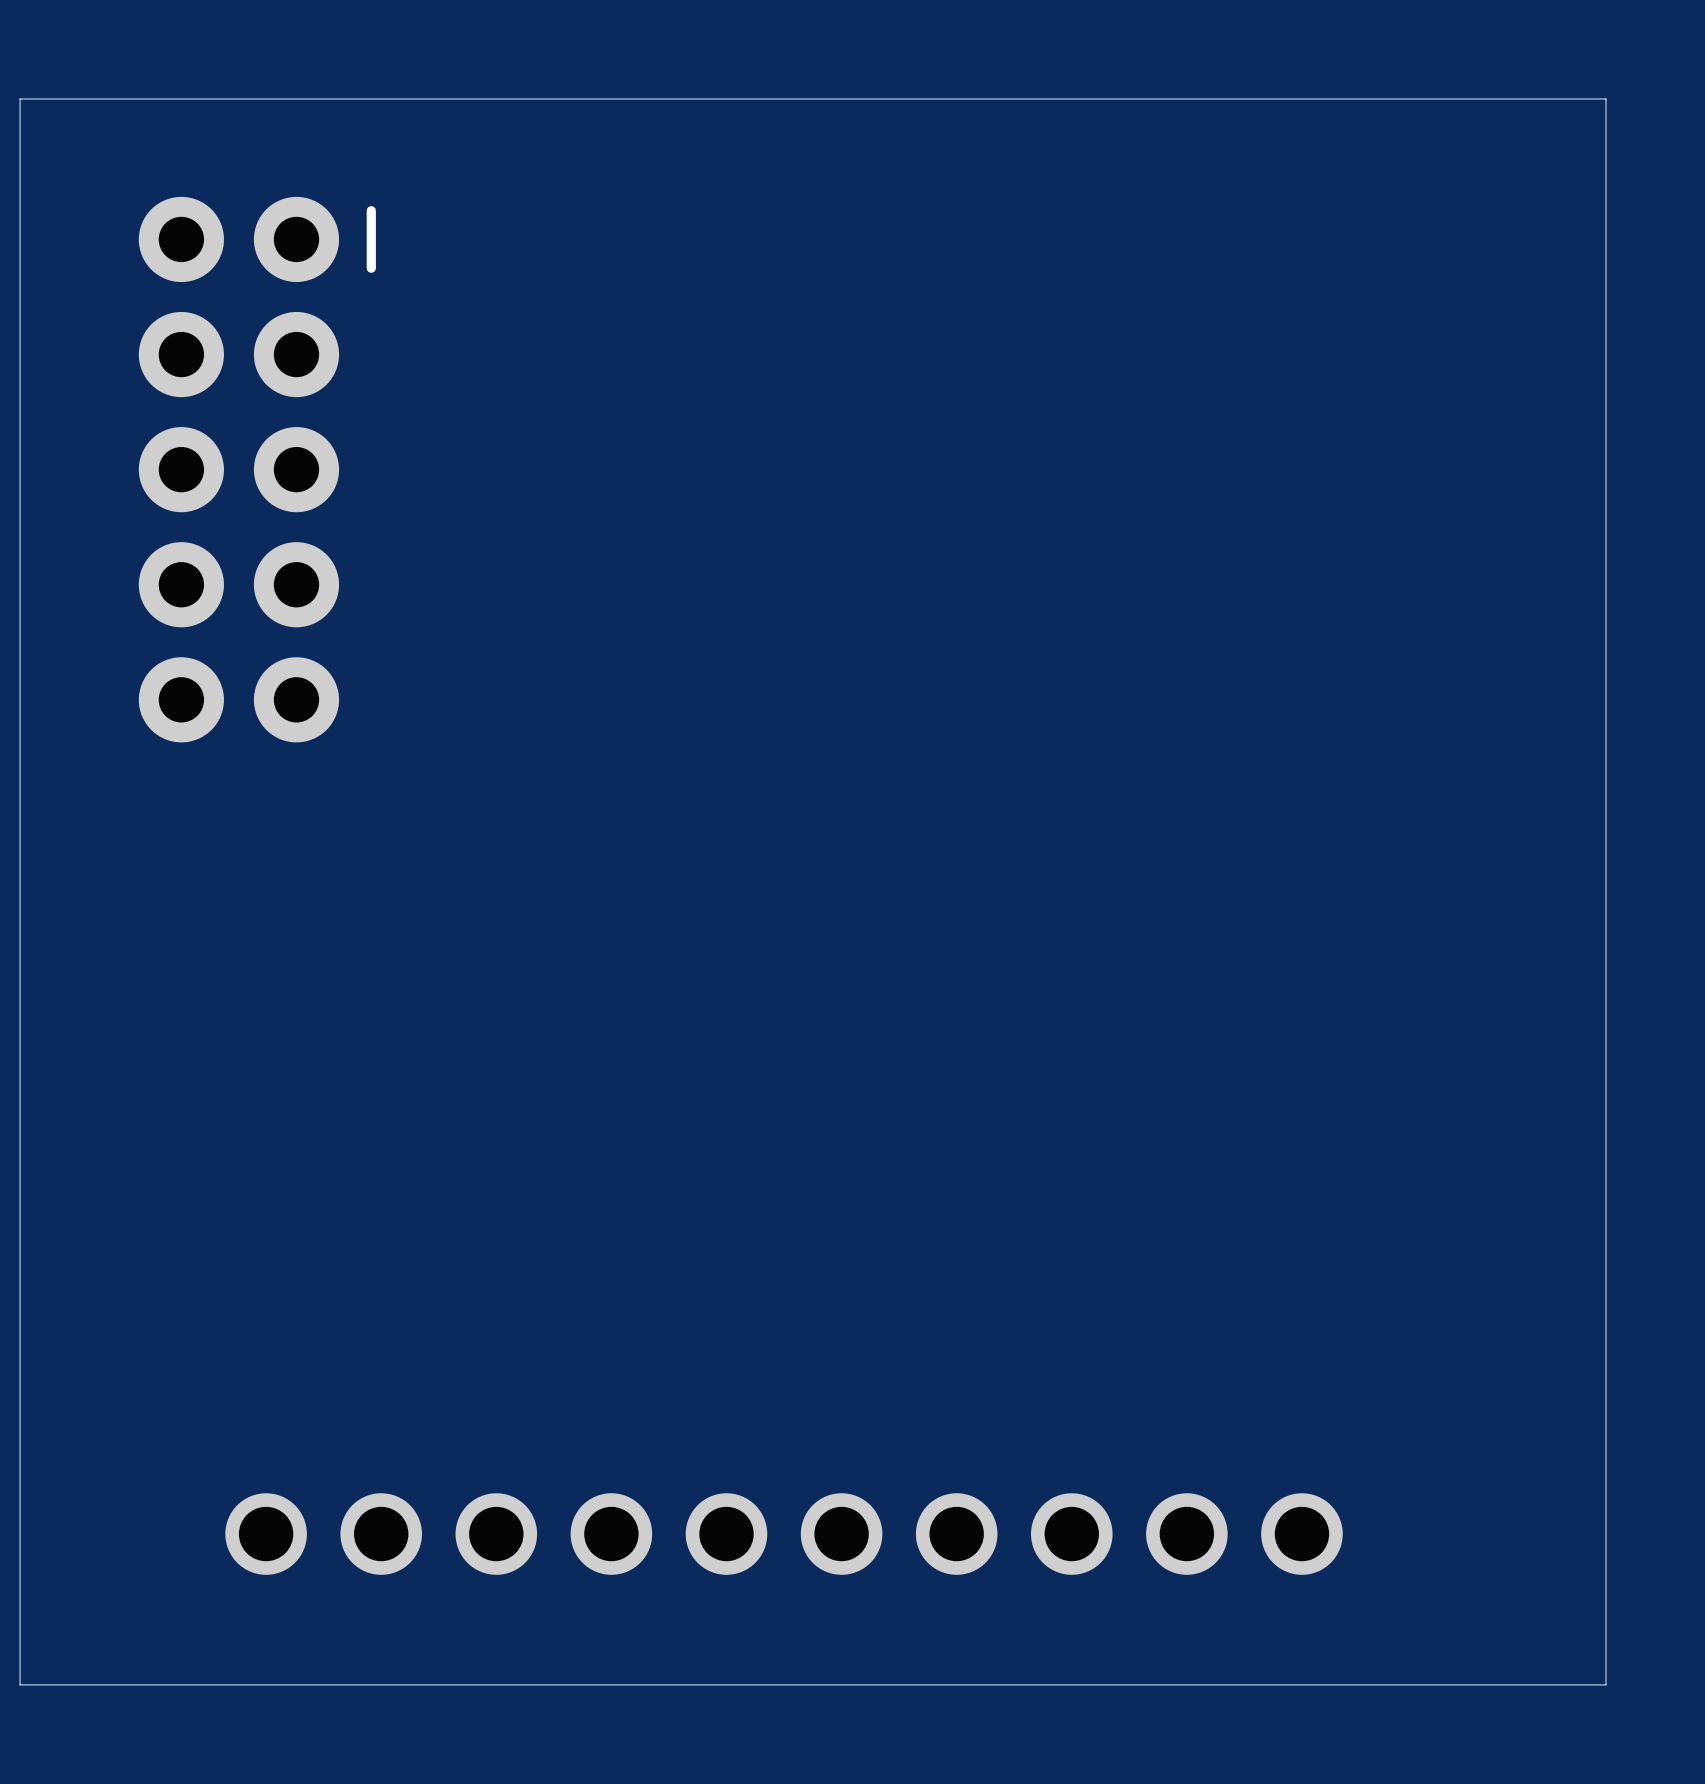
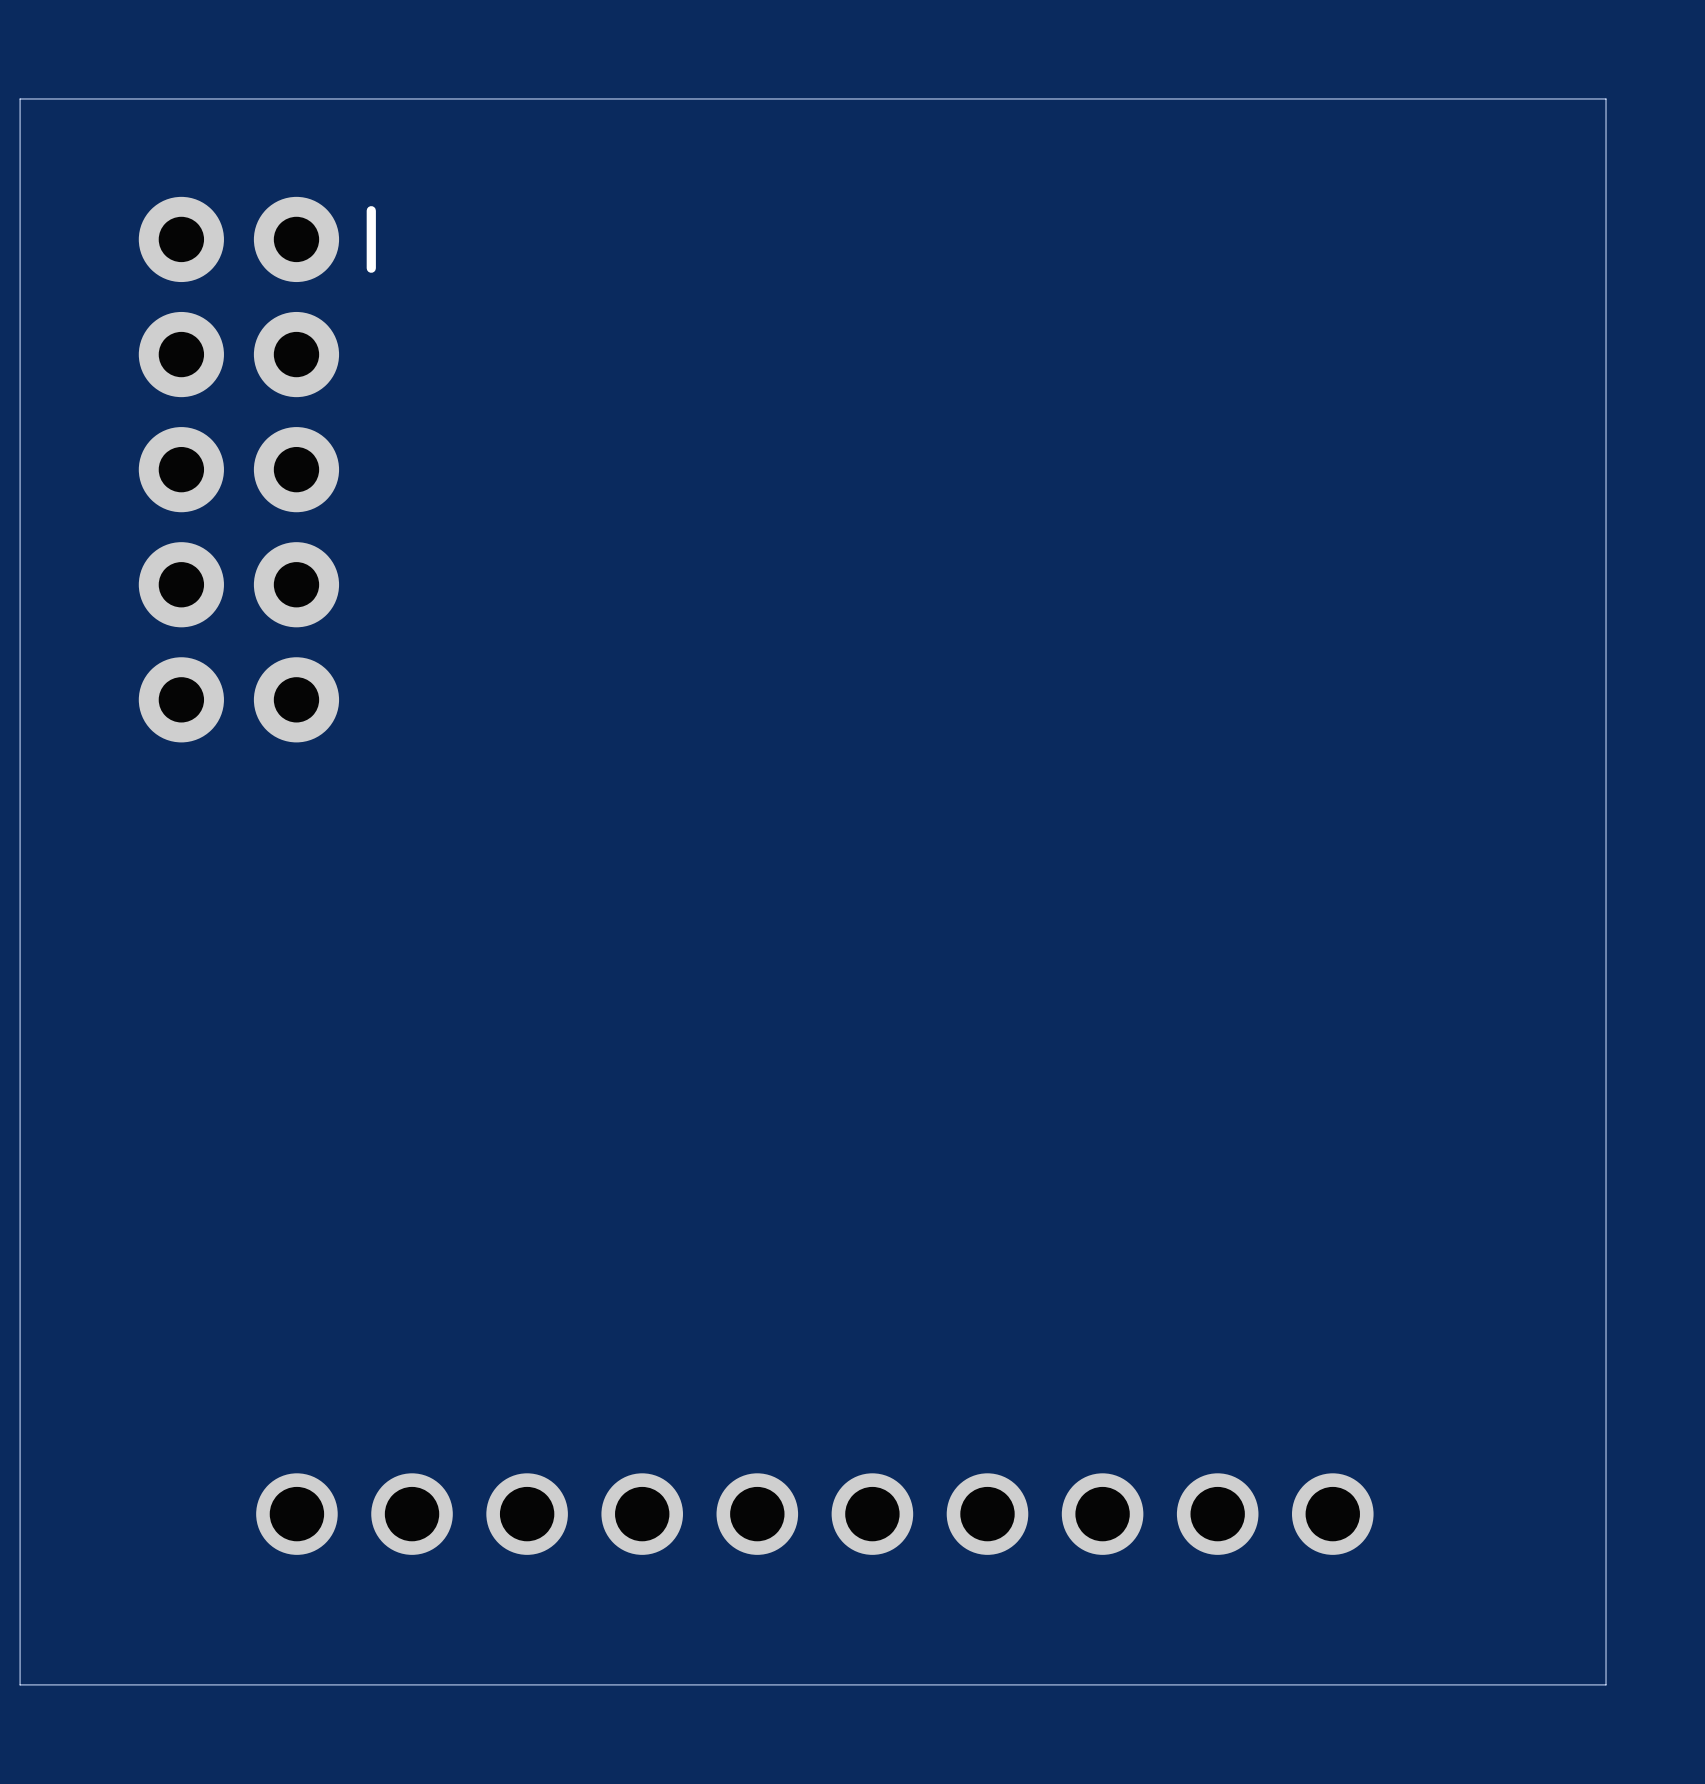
part position: (784, 1534) -> (814, 1514)

